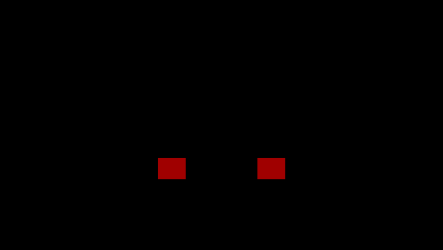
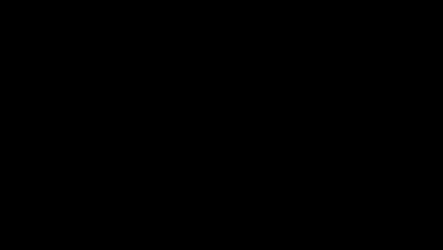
part: (221, 168) -> none

